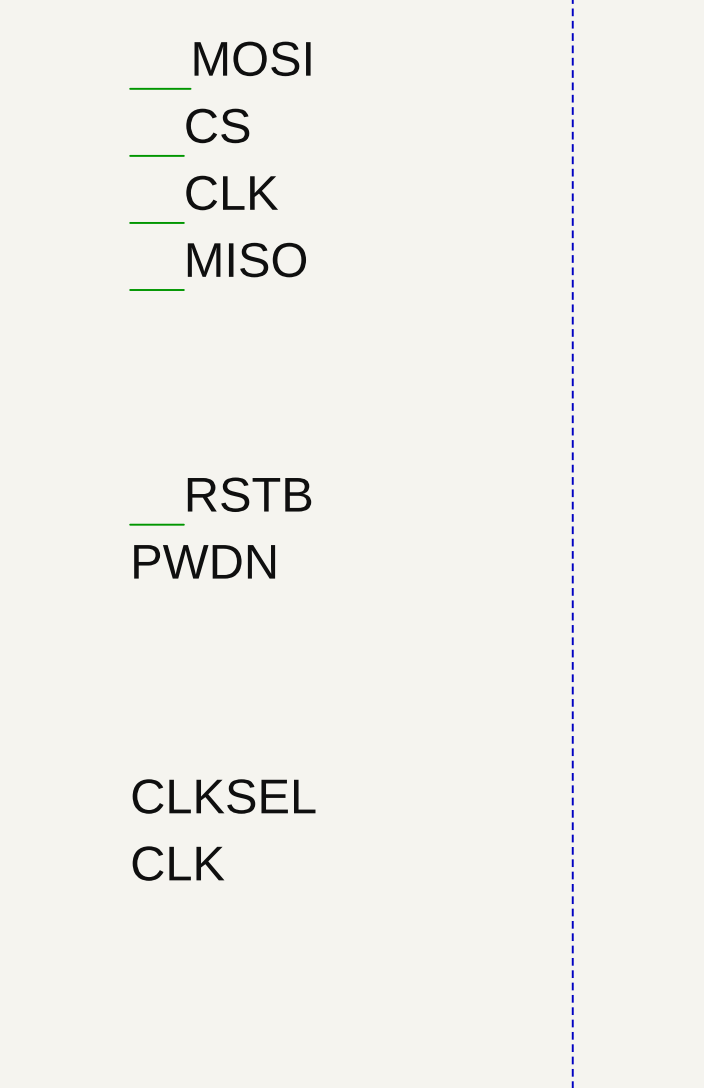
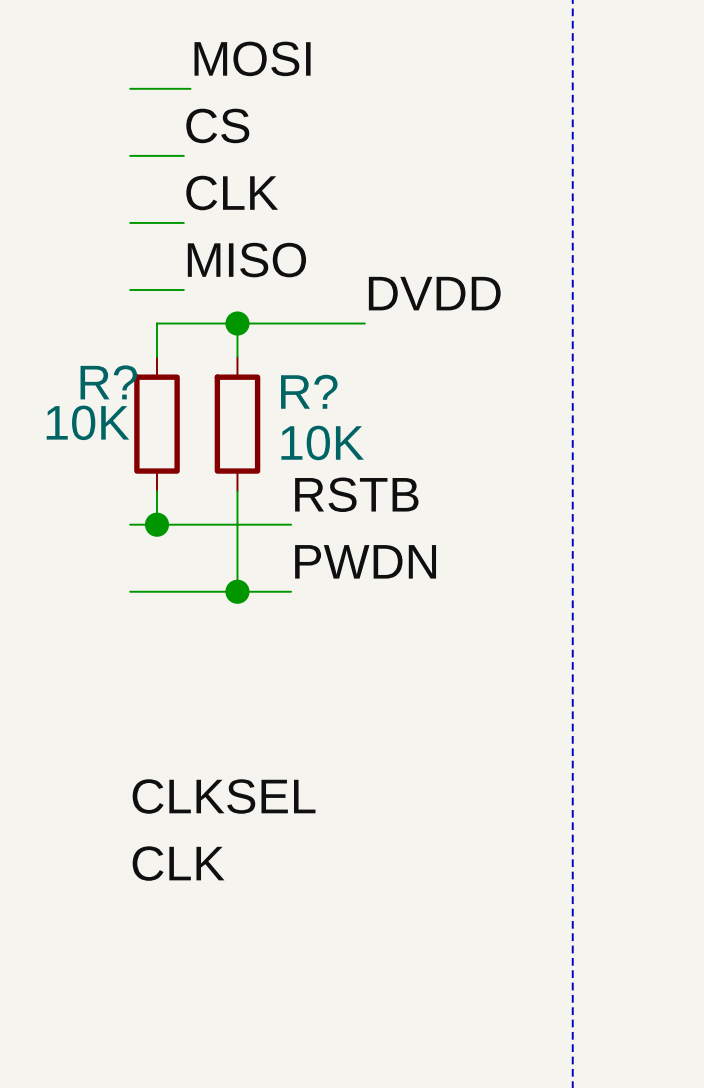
label: none -> DVDD (434, 293)
wire: none -> (237, 323) (237, 357)
junction: none -> (237, 323)
wire: none -> (364, 323) (157, 323) (157, 357)
R?: none -> 10K (157, 424)
R?: none -> 10K (237, 424)
wire: none -> (157, 491) (157, 524)
wire: none -> (237, 491) (237, 591)
label position: RSTB (249, 494) -> RSTB (356, 494)
junction: none -> (157, 524)
wire: none -> (183, 524) (291, 524)
label position: PWDN (204, 561) -> PWDN (365, 561)
wire: none -> (130, 591) (291, 591)
junction: none -> (237, 591)

